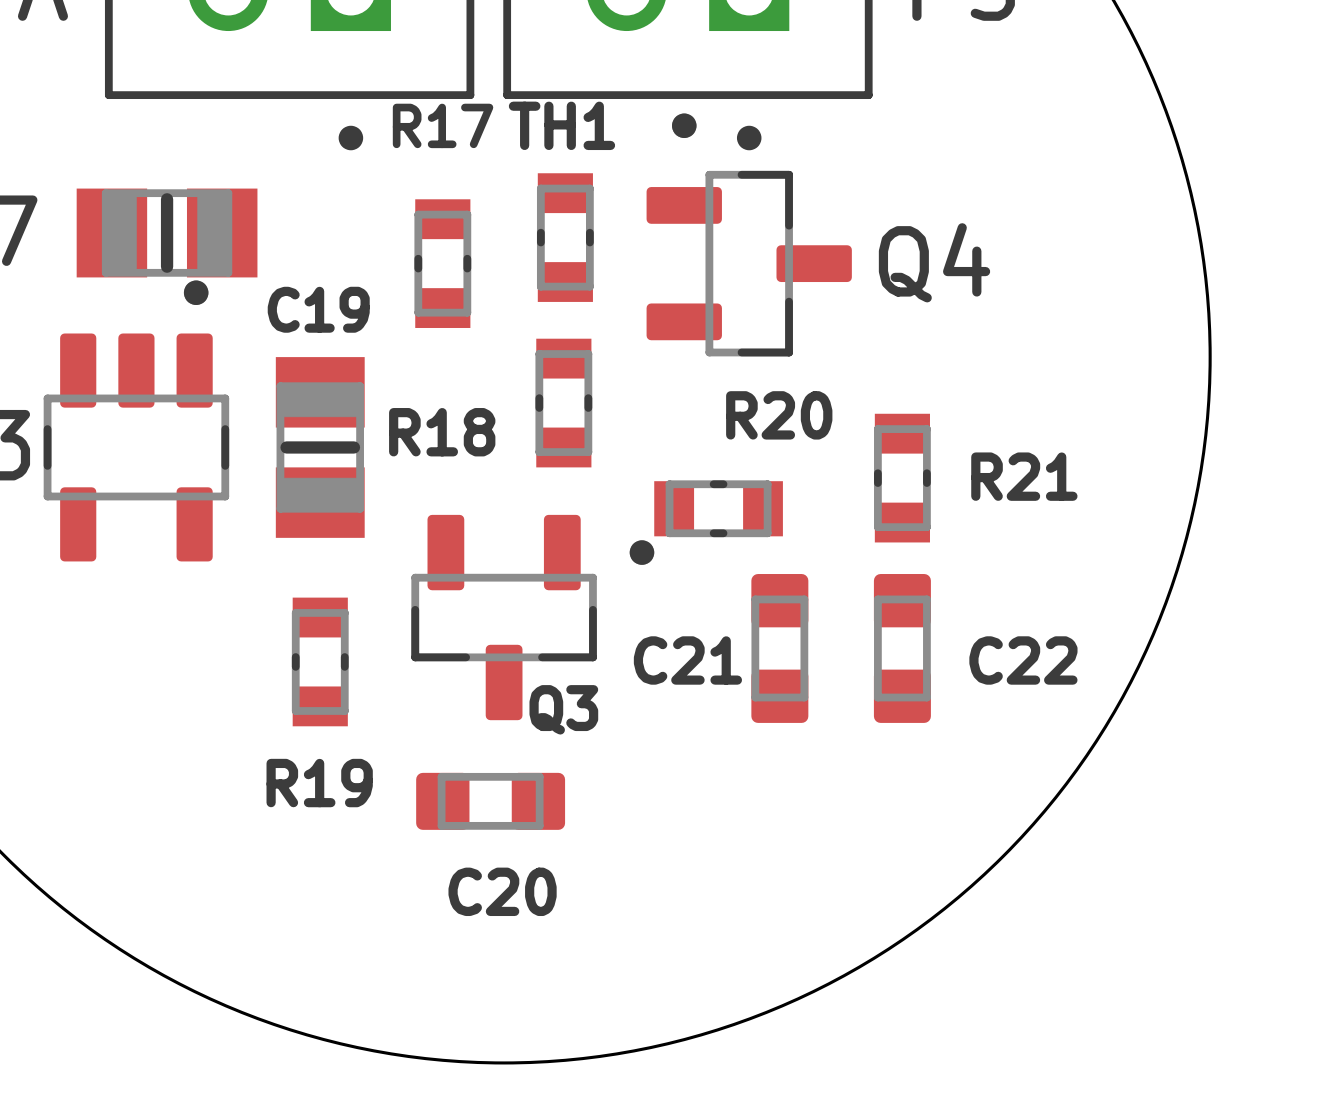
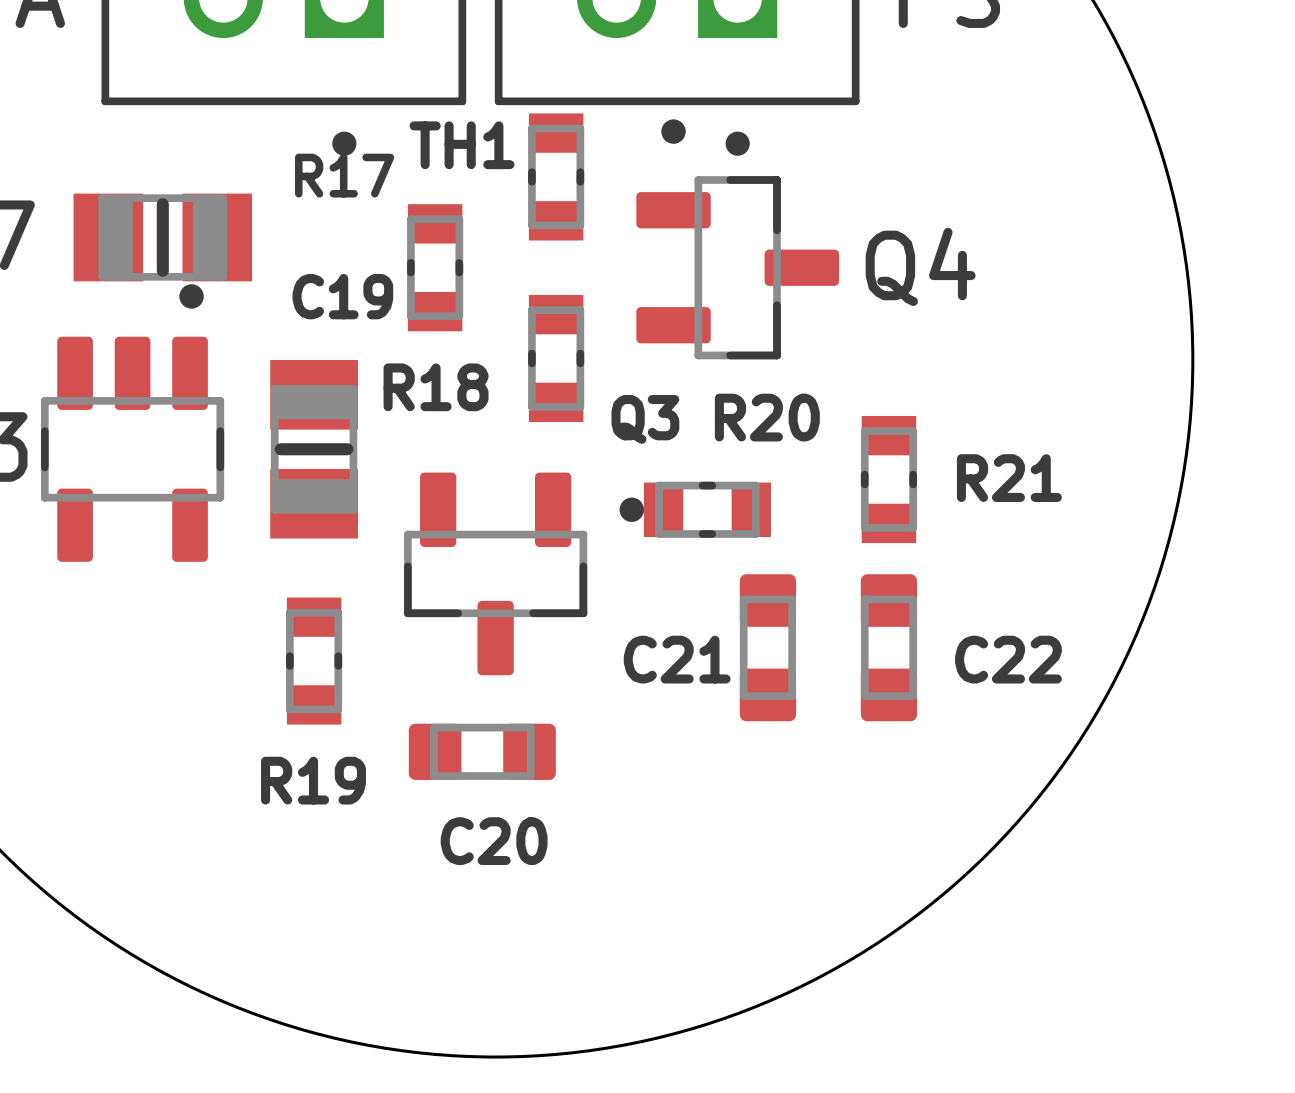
R17 name position: R17 (443, 125) -> R17 (344, 175)
TH1 name position: TH1 (561, 125) -> TH1 (462, 145)
TH1 position: (565, 237) -> (556, 176)
C19 name position: C19 (318, 309) -> C19 (342, 296)
R18 position: (563, 403) -> (556, 358)
Q3 position: (532, 617) -> (523, 573)
Q3 name position: Q3 (563, 709) -> Q3 (645, 419)
C20 position: (490, 801) -> (482, 751)

